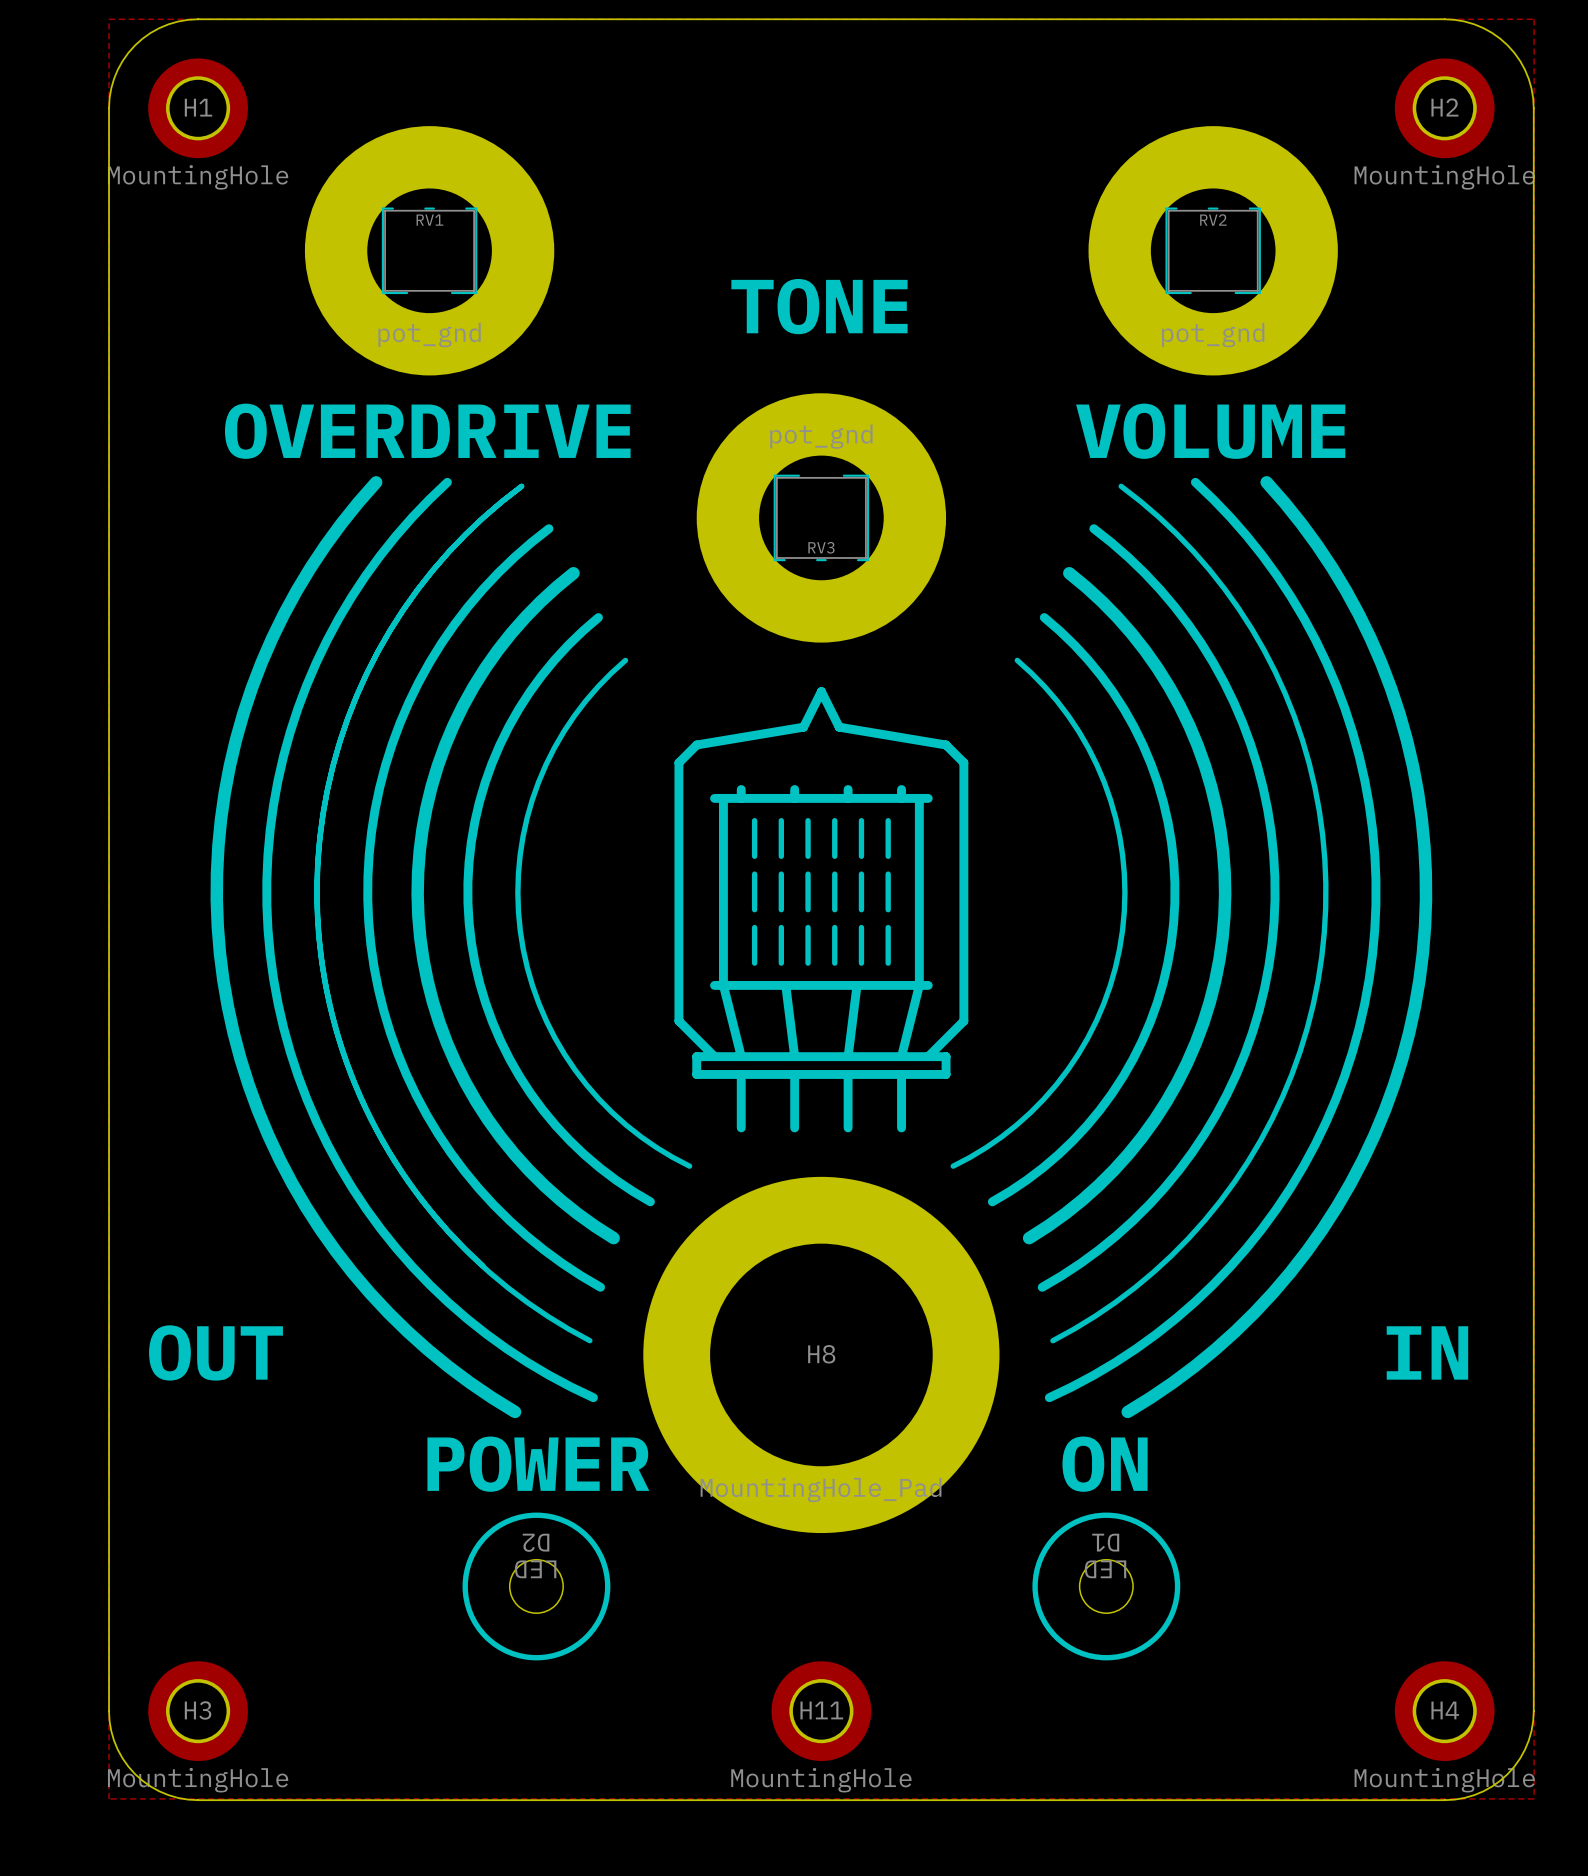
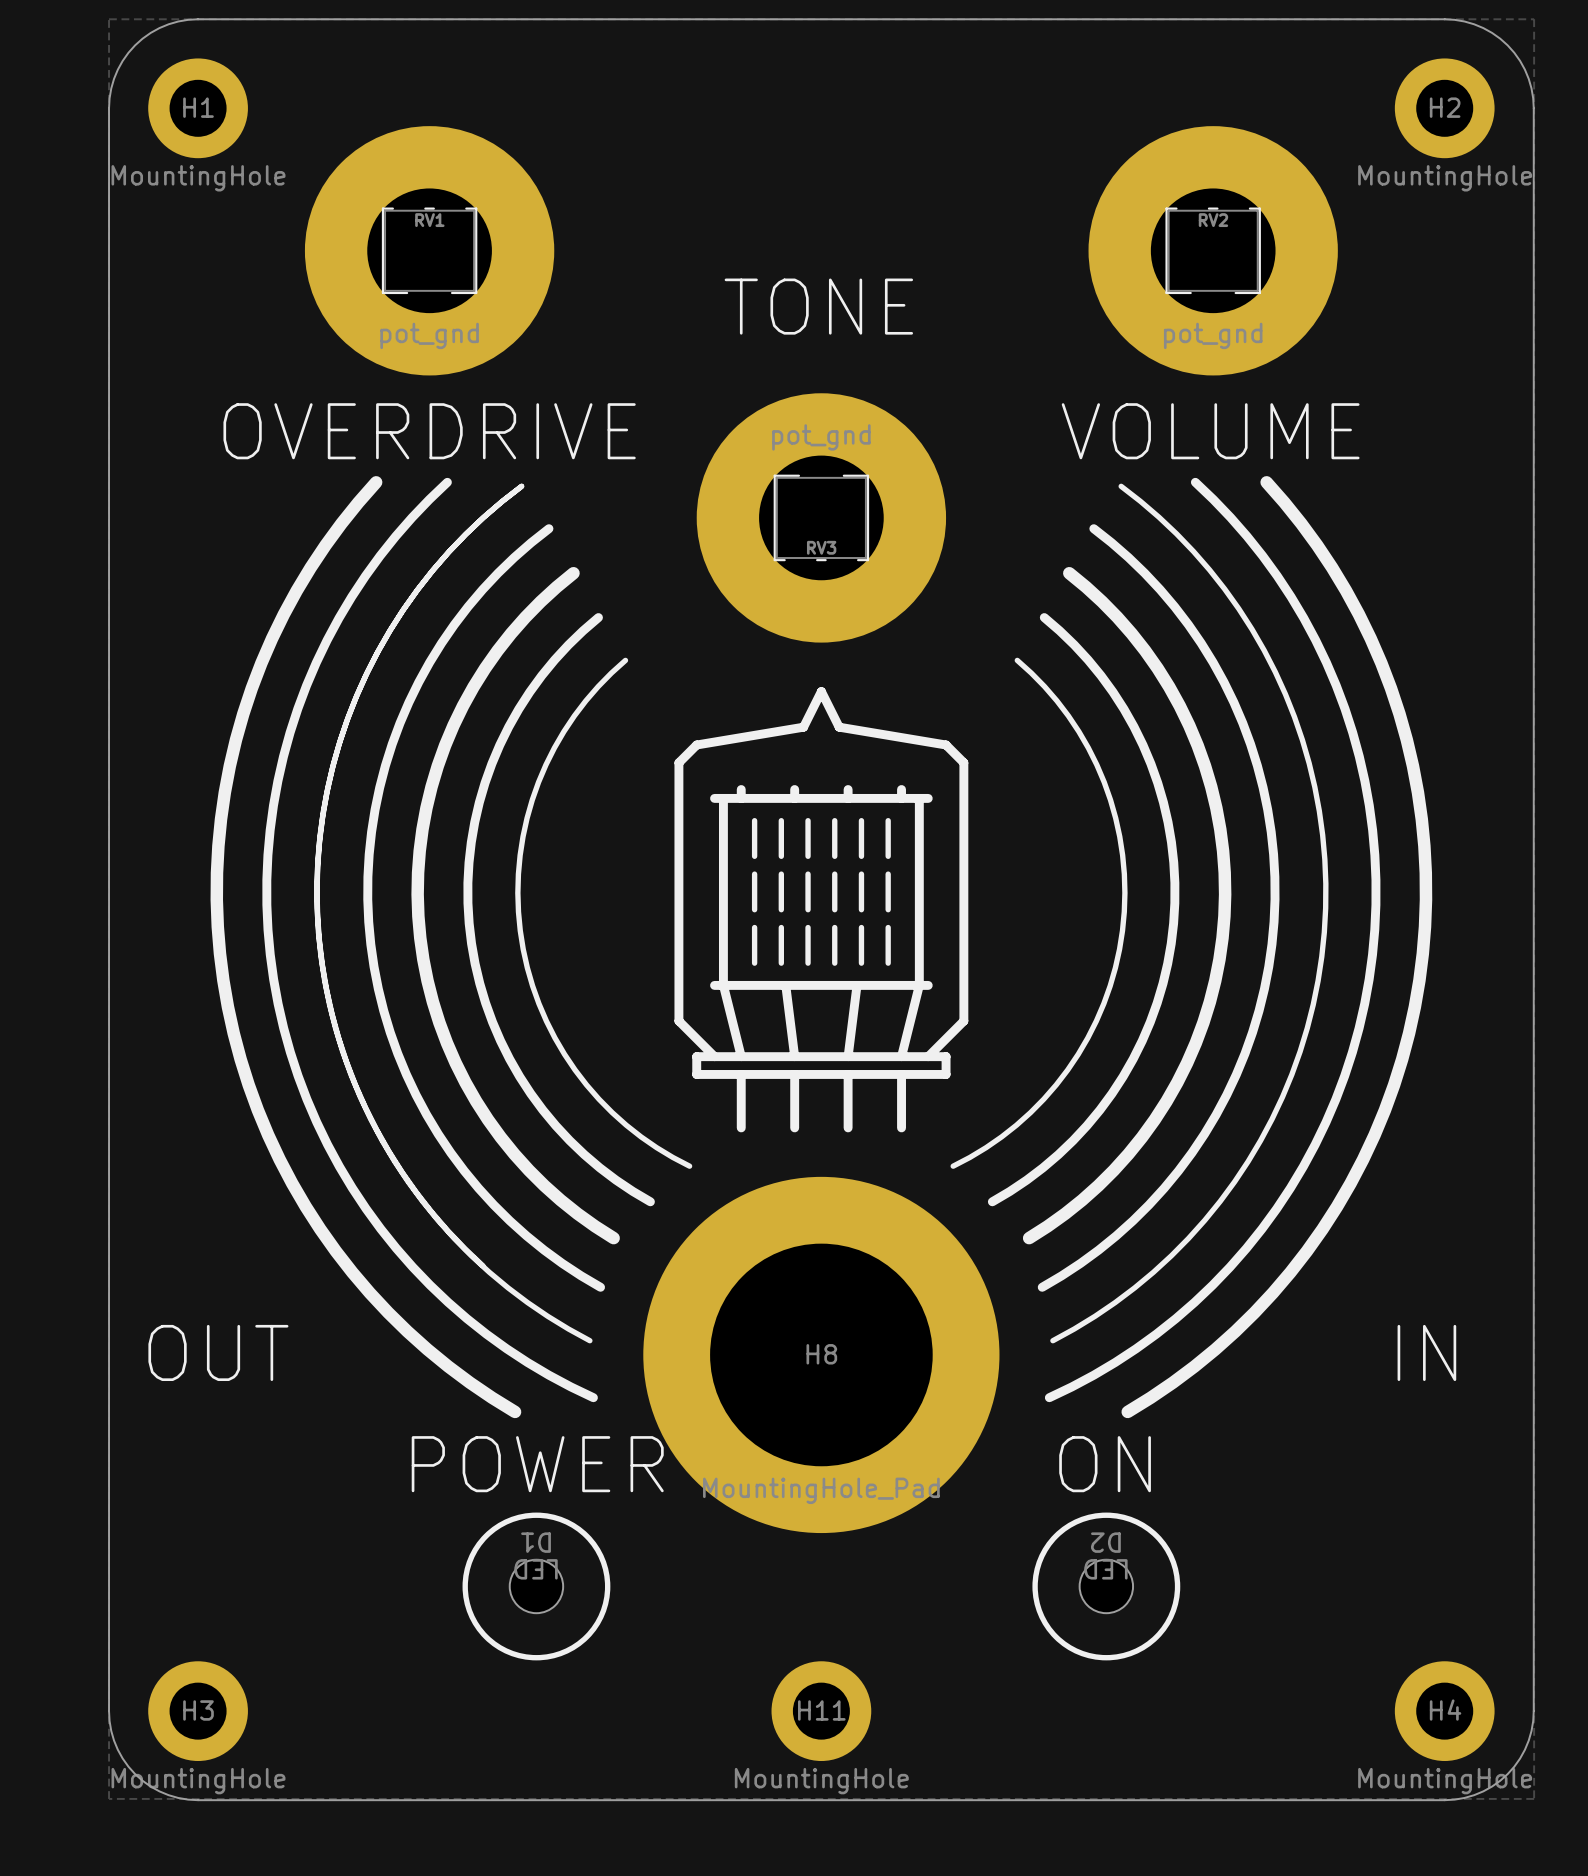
D2 name: D2 (536, 1542) -> D1 (536, 1542)
D1 name: D1 (1105, 1542) -> D2 (1105, 1542)

